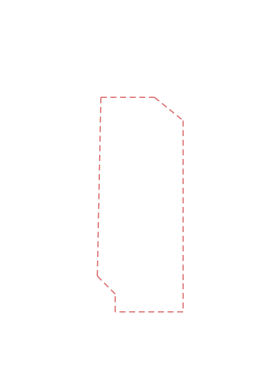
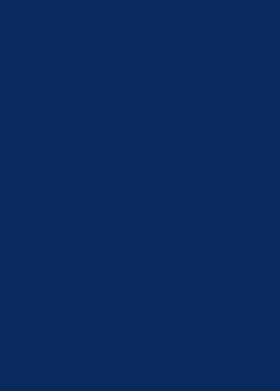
zone outline: (100, 97) (97, 276) (115, 293) (115, 311) (183, 311) (183, 120) (154, 97) (100, 97) -> none

